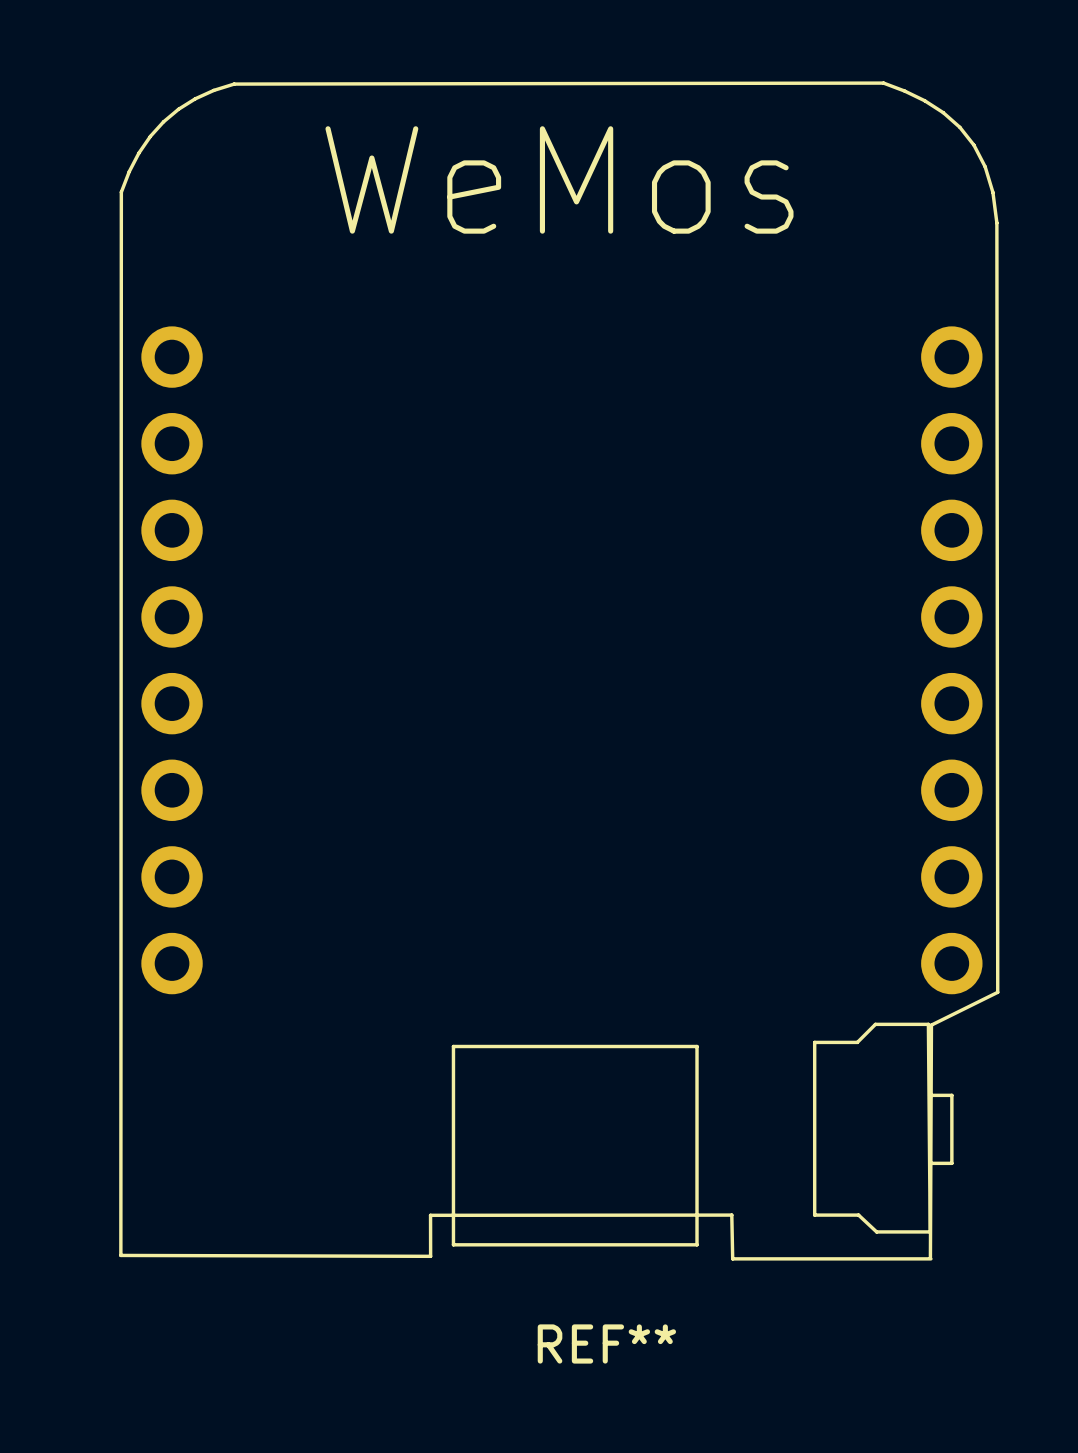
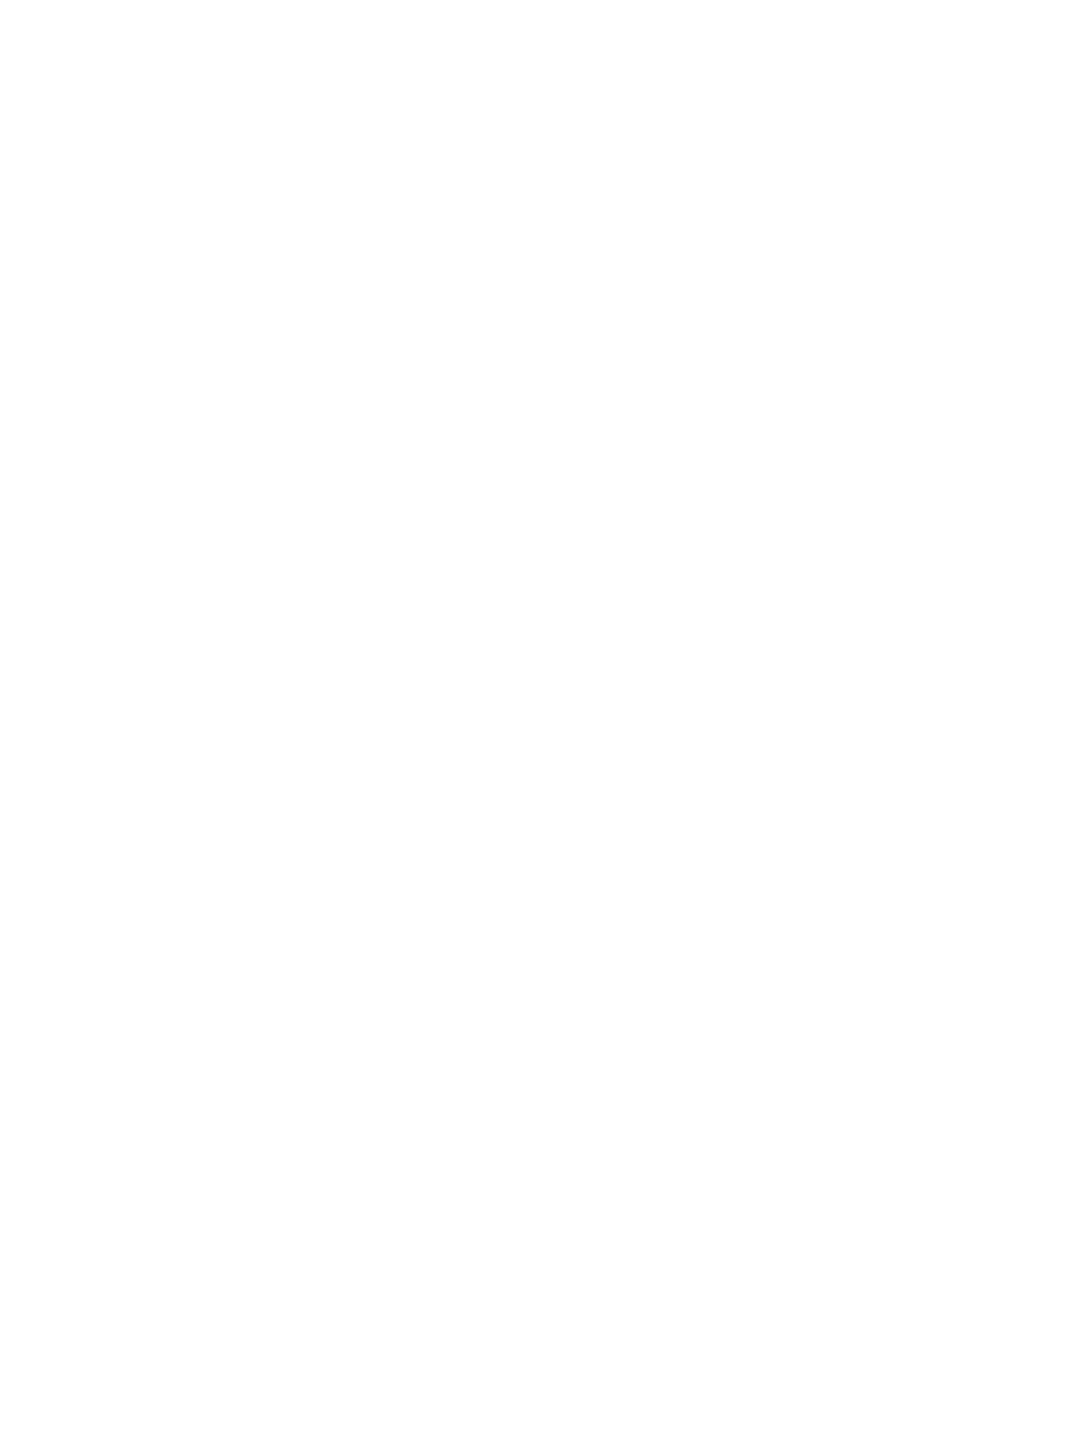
REF**: (559, 670) -> none

